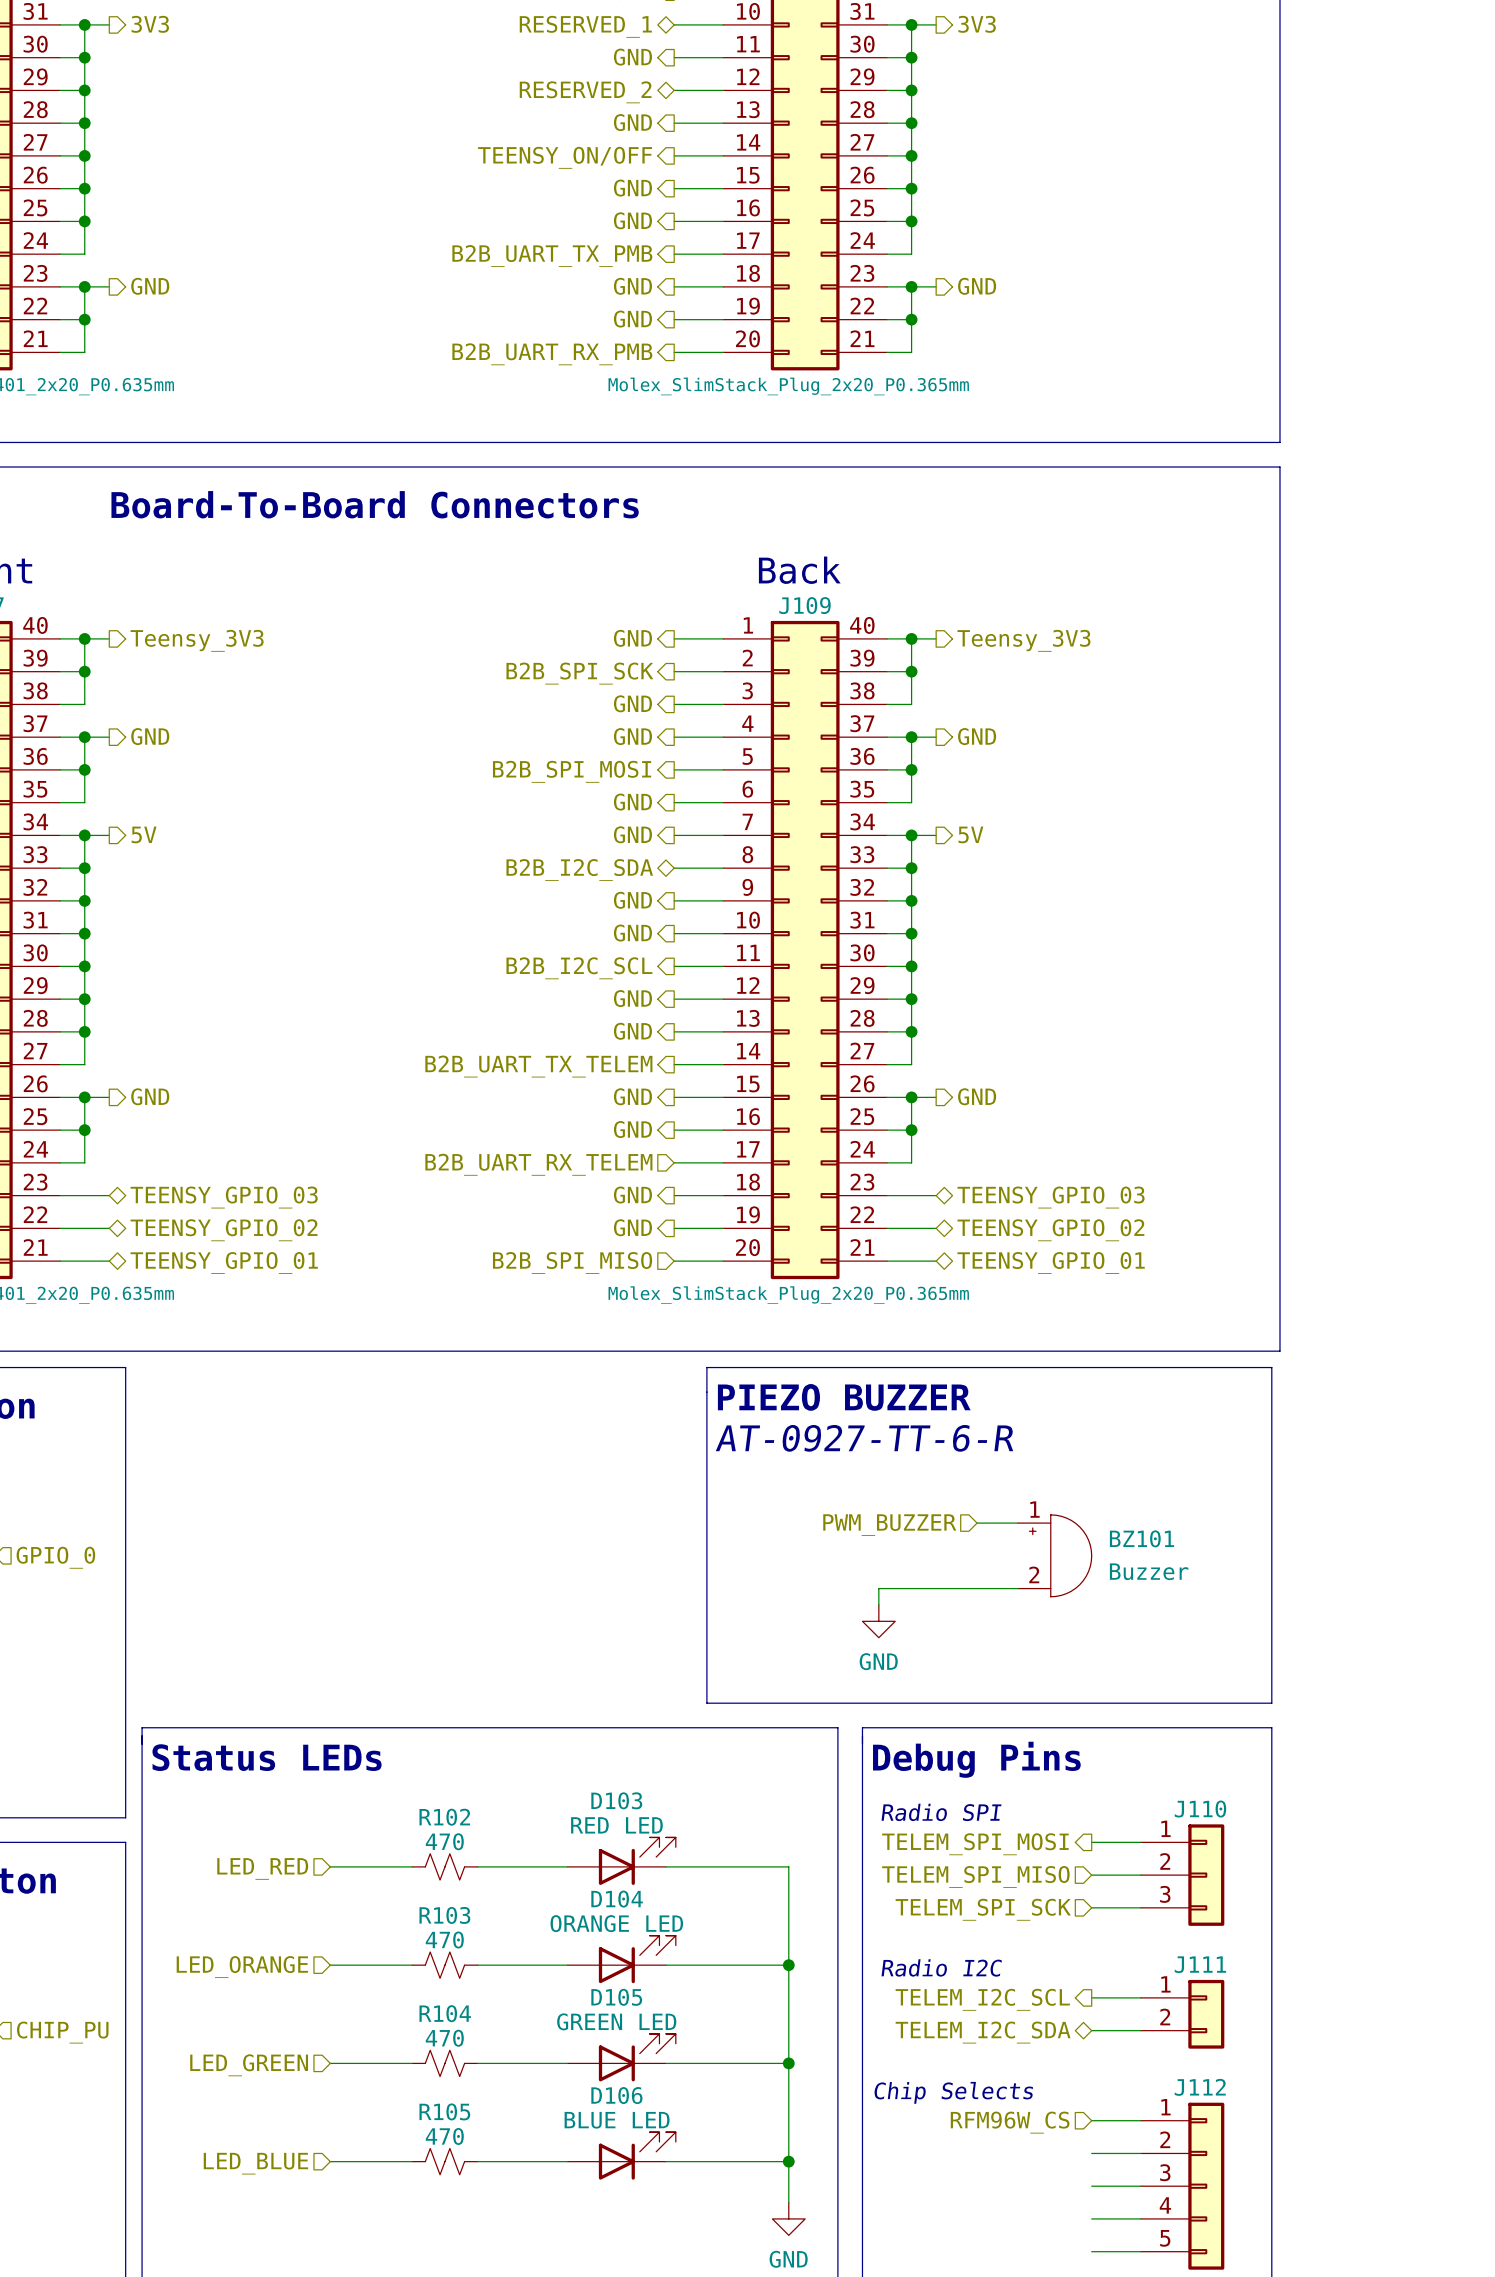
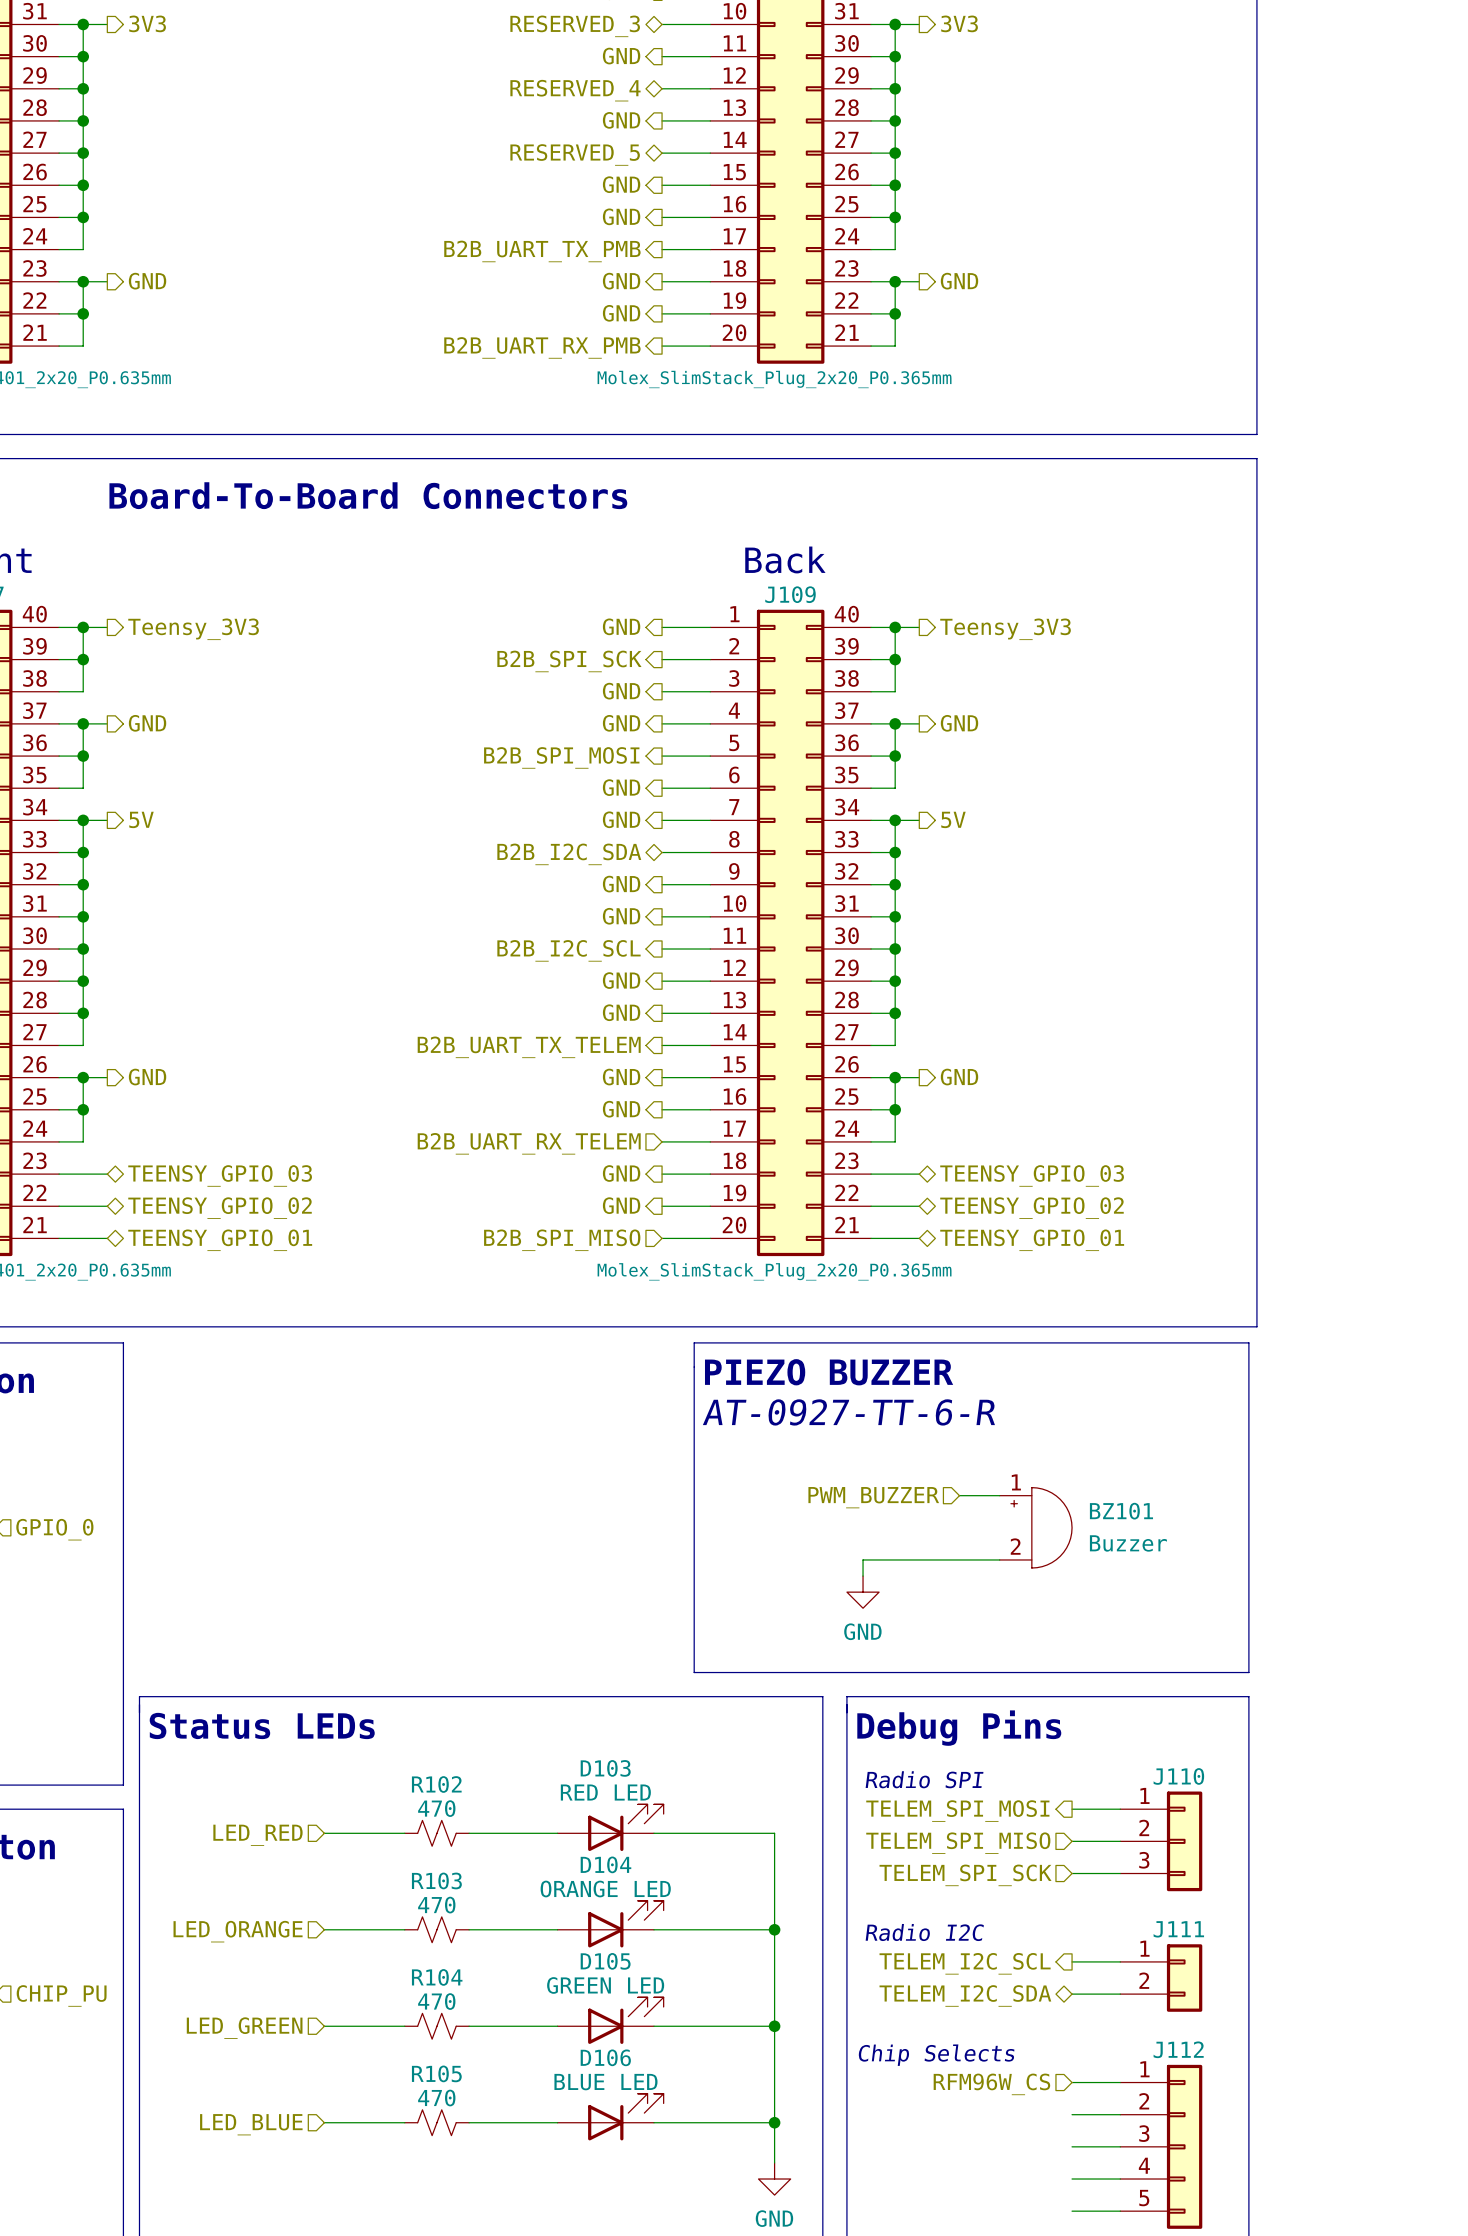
hierarchical label: RESERVED_1 (585, 26) -> RESERVED_3 (575, 26)
hierarchical label: RESERVED_2 (585, 92) -> RESERVED_4 (575, 90)
hierarchical label shape: output (565, 157) -> bidirectional (575, 154)
hierarchical label: TEENSY_ON/OFF (565, 157) -> RESERVED_5 (575, 154)

